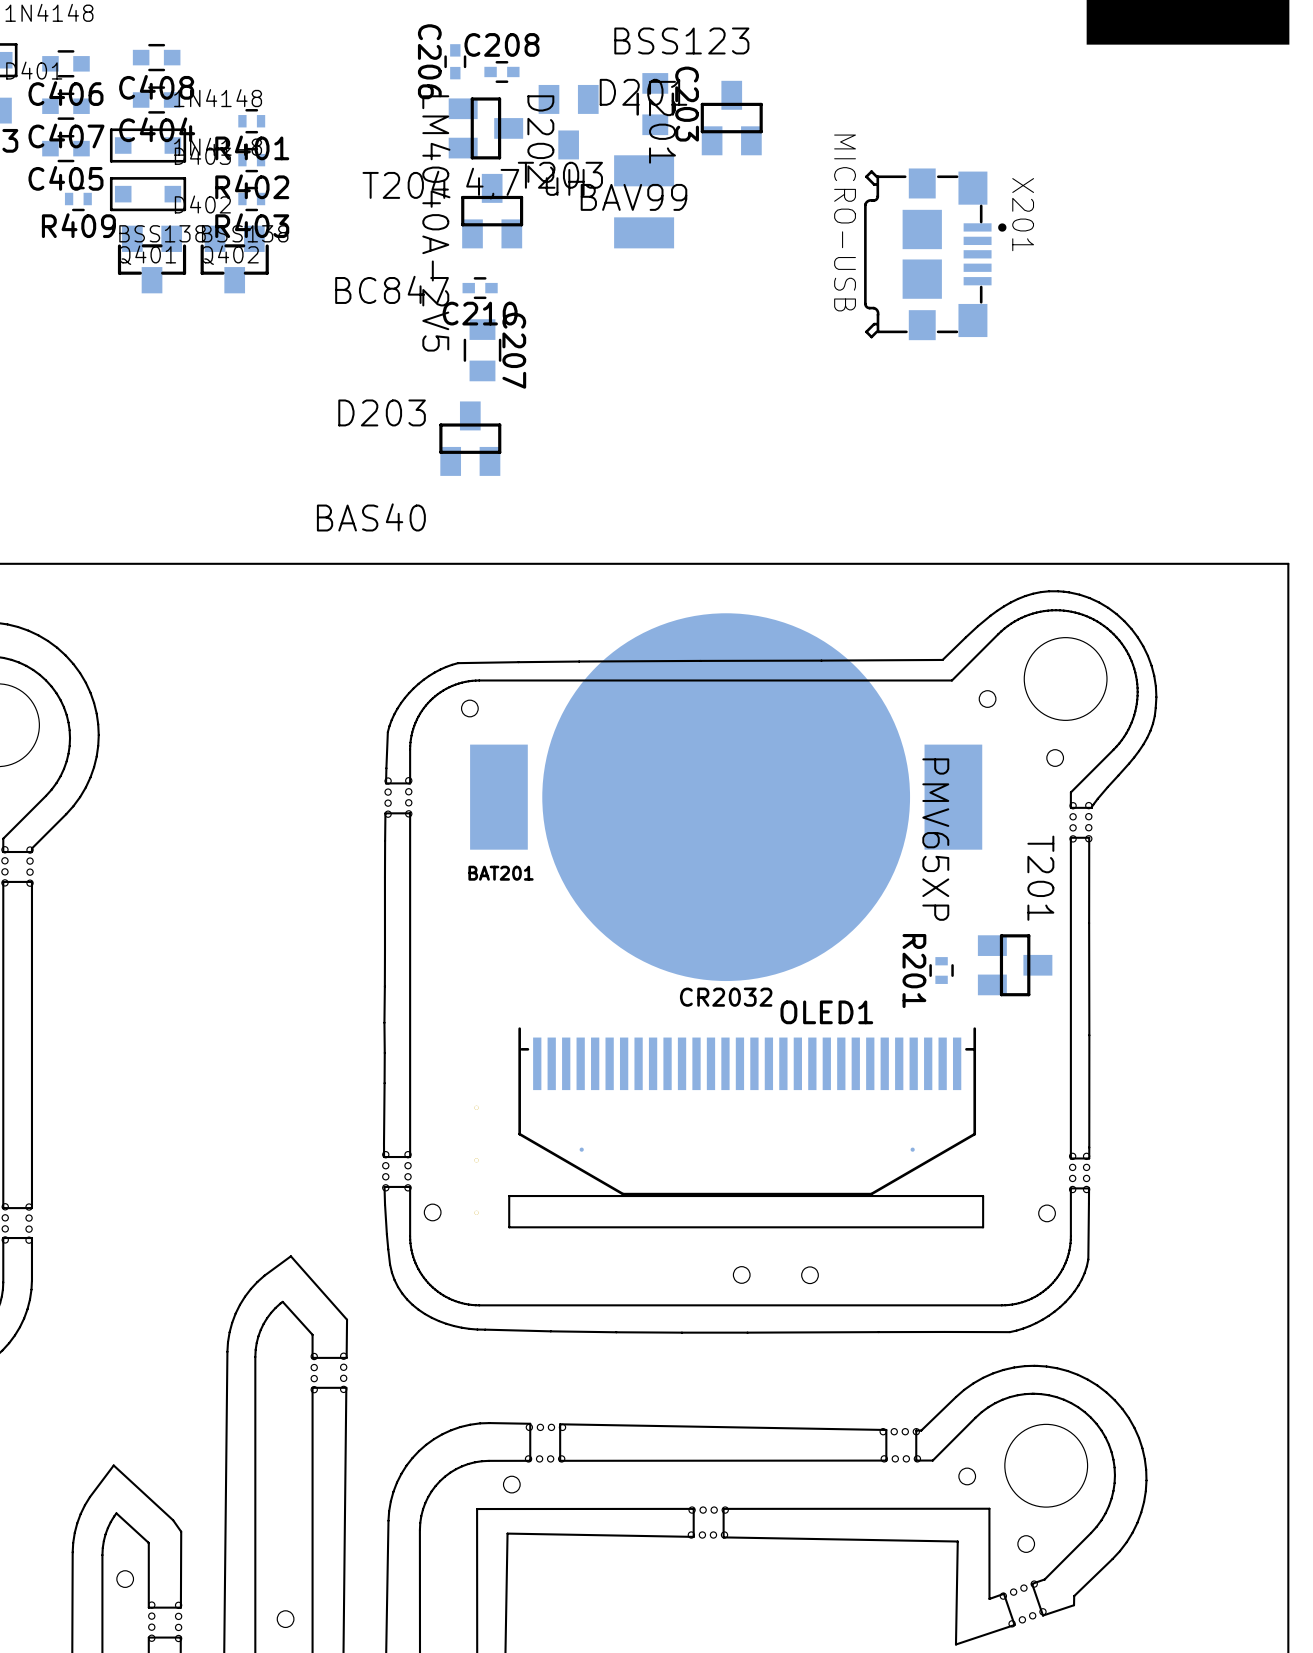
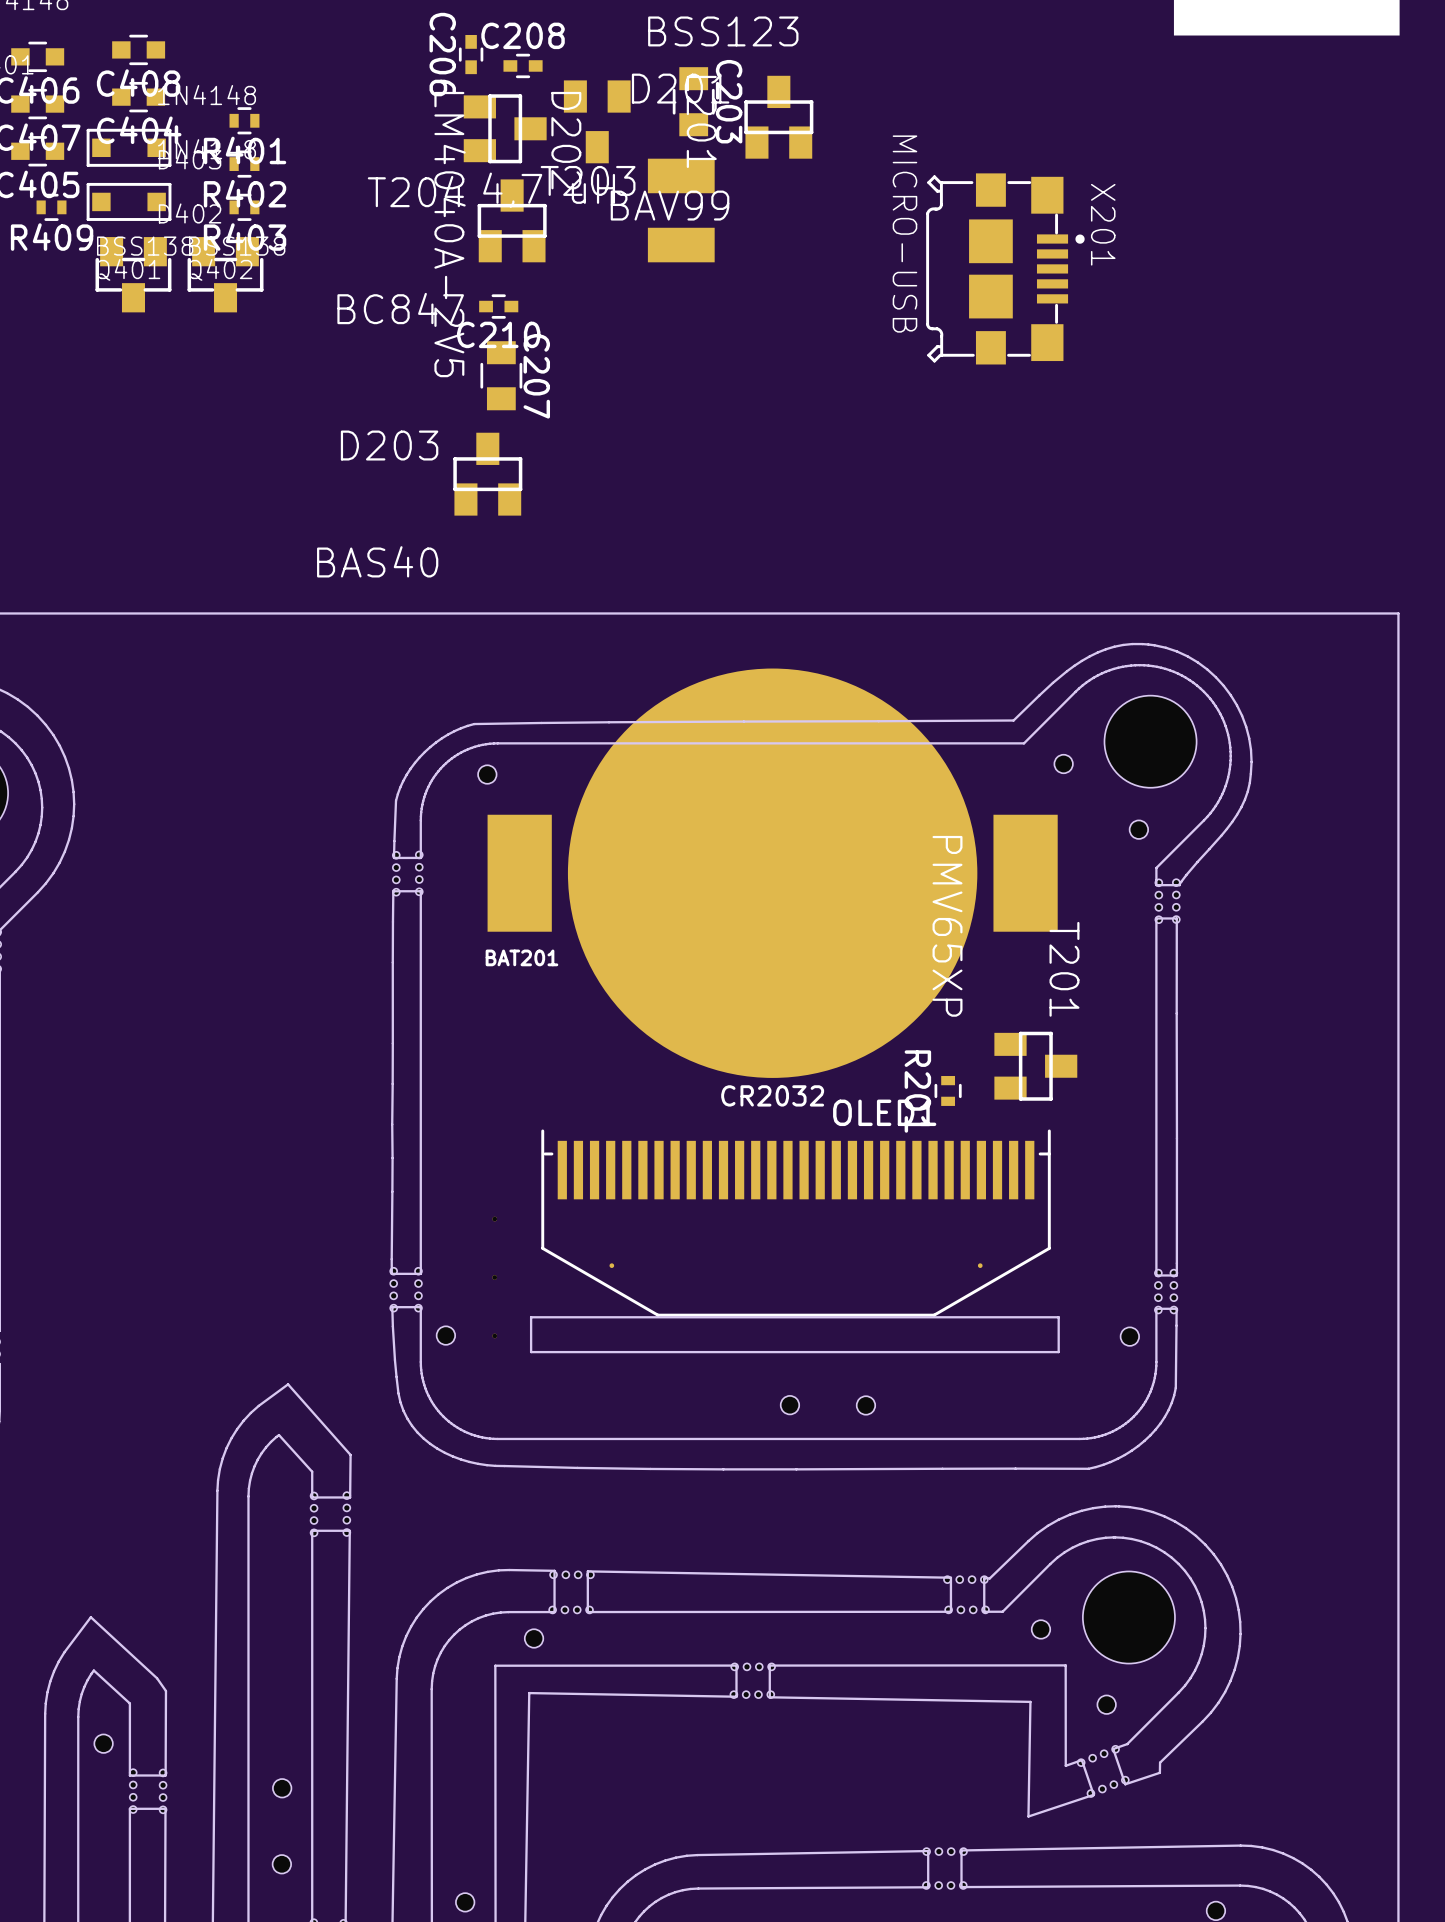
T201 position: (1015, 965) -> (1035, 1066)
R201 position: (941, 970) -> (948, 1090)

